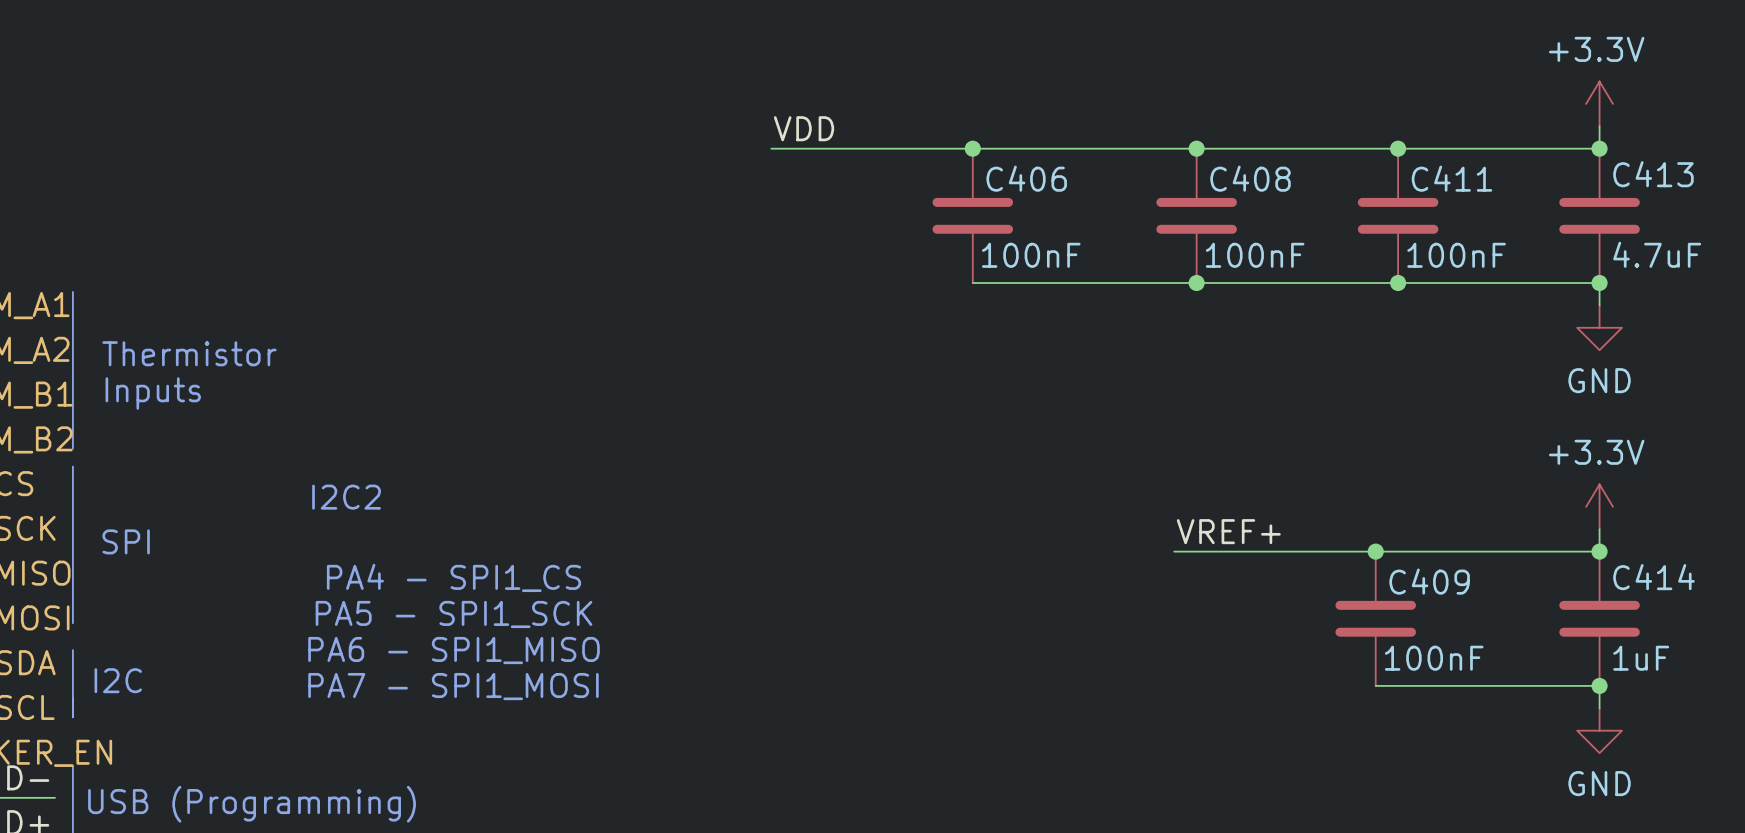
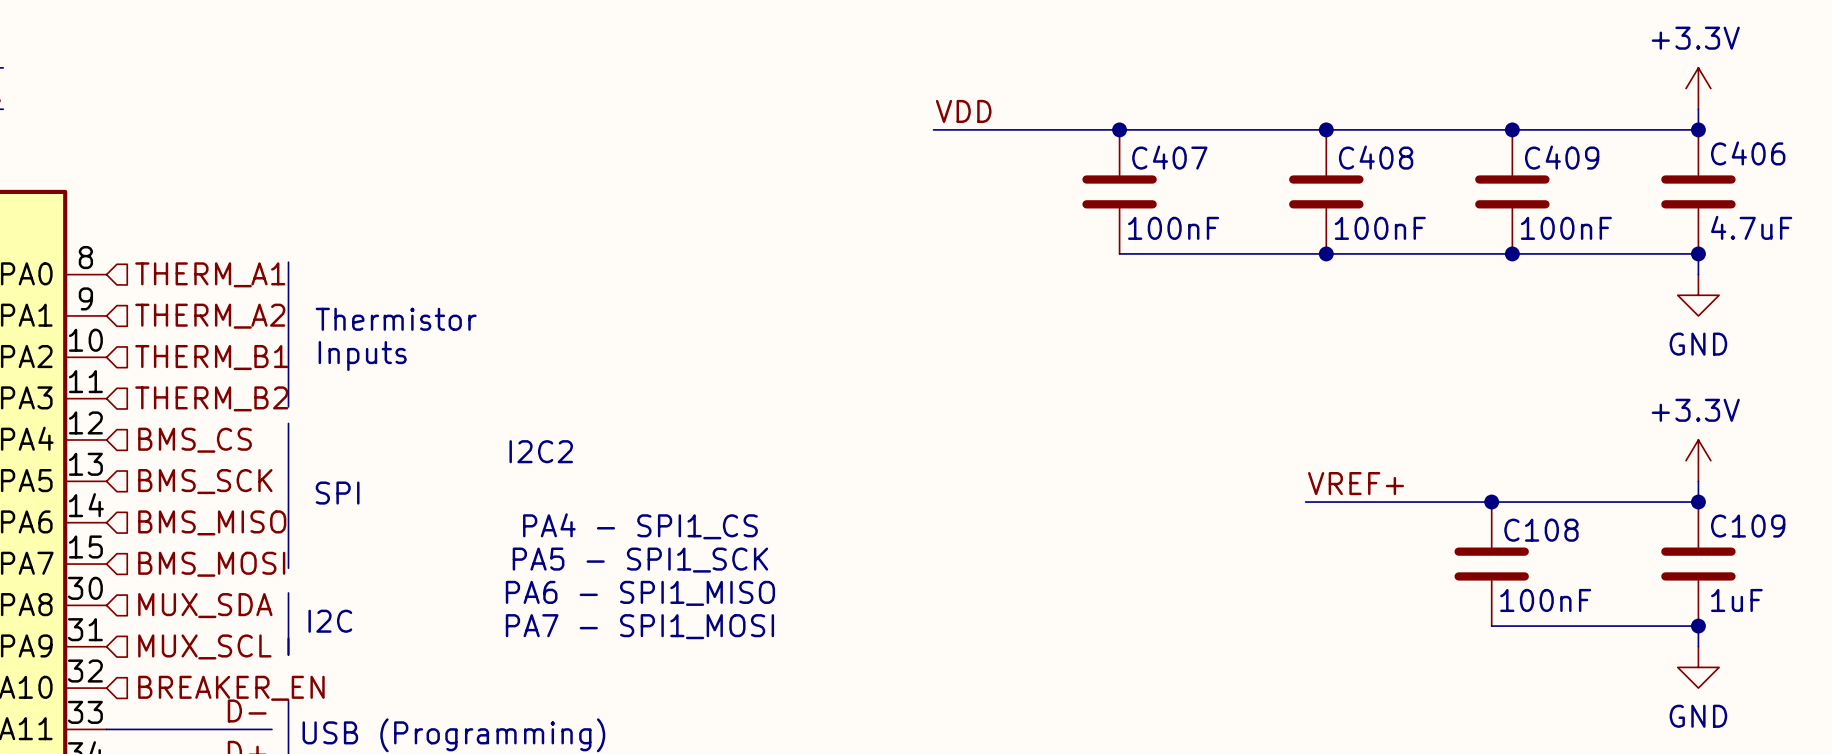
C413 name: C413 (1653, 174) -> C406 (1748, 153)
C406 name: C406 (1026, 178) -> C407 (1169, 157)
C411 name: C411 (1451, 178) -> C409 (1562, 157)
C414 name: C414 (1653, 577) -> C109 (1748, 526)
C409 name: C409 (1429, 581) -> C108 (1541, 530)

